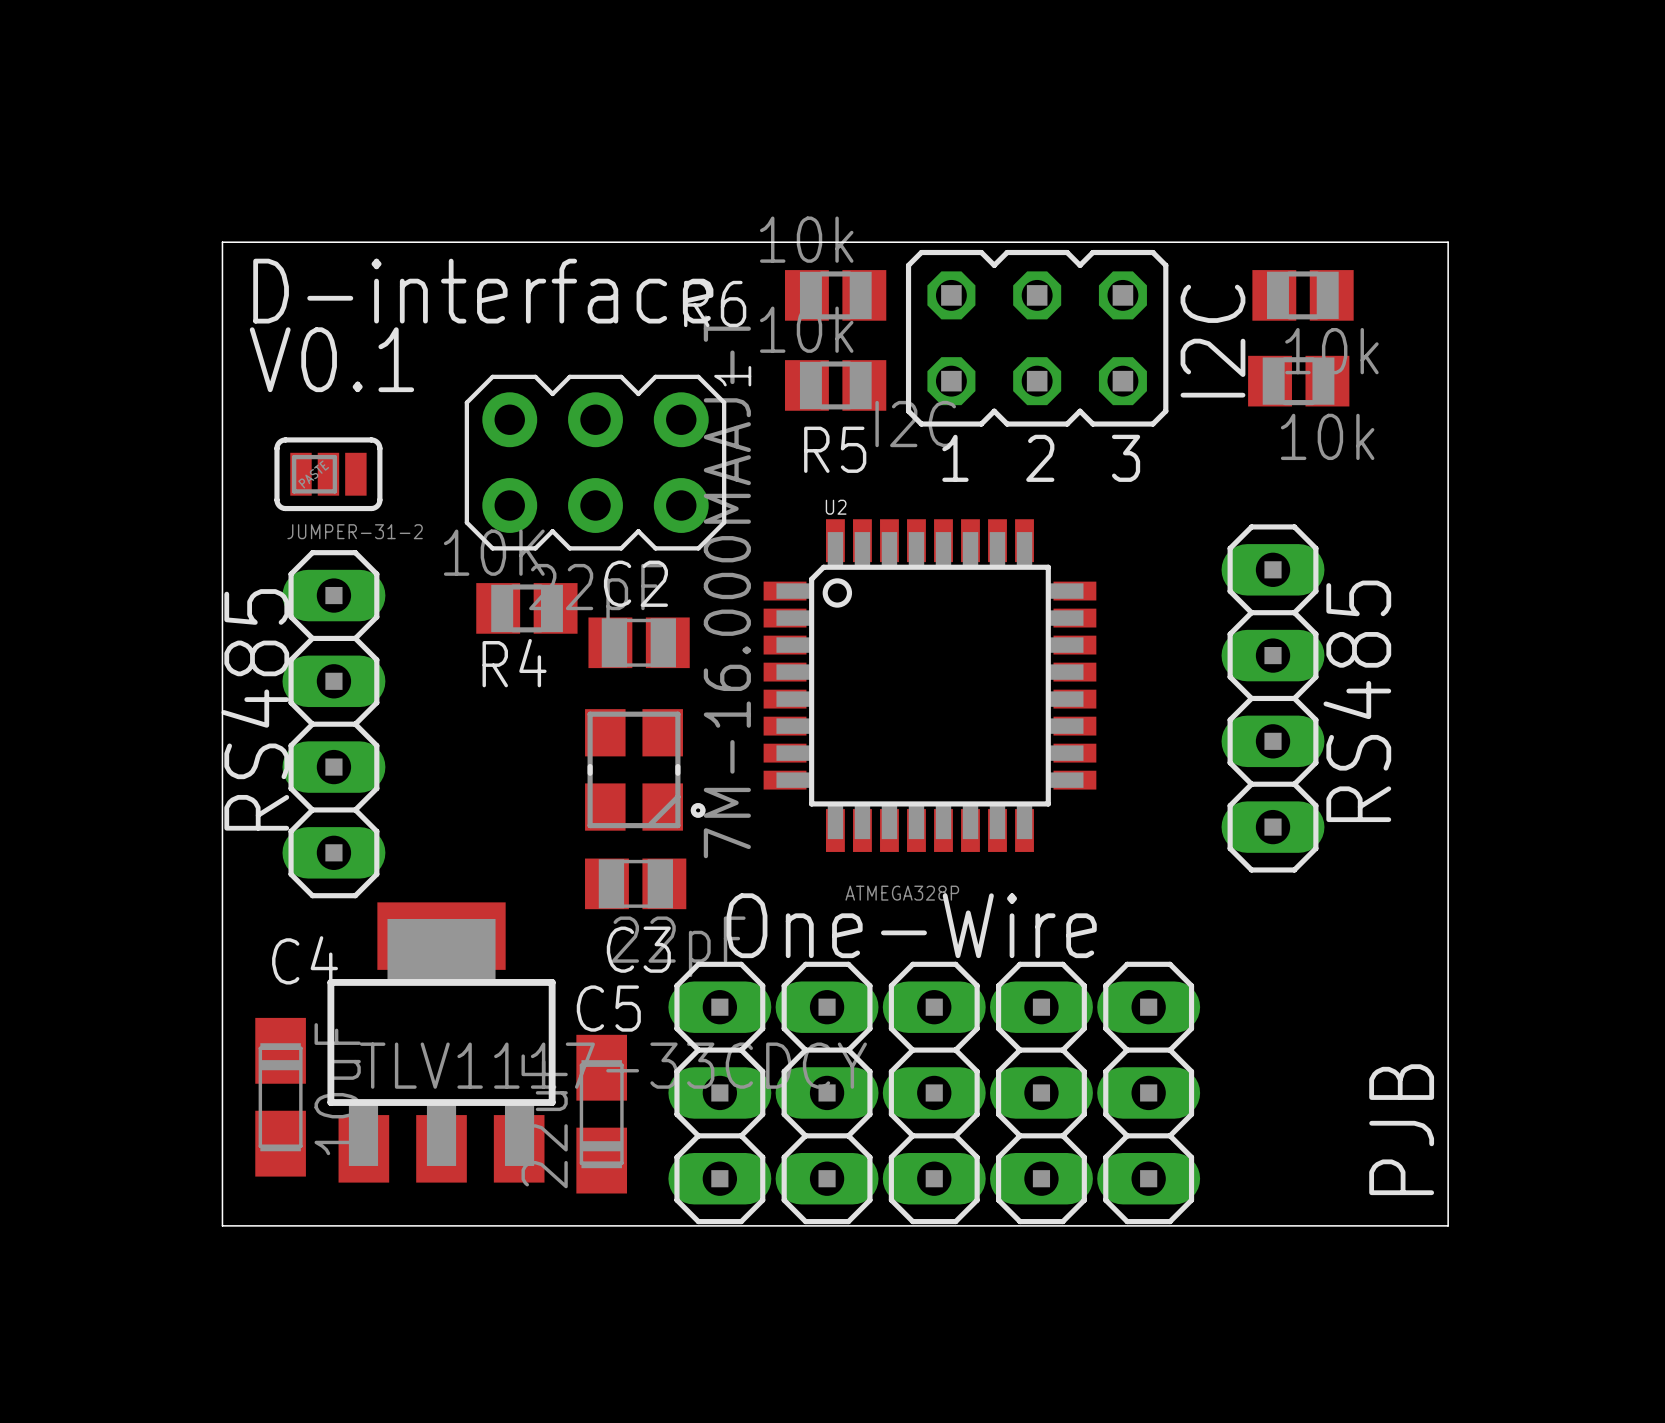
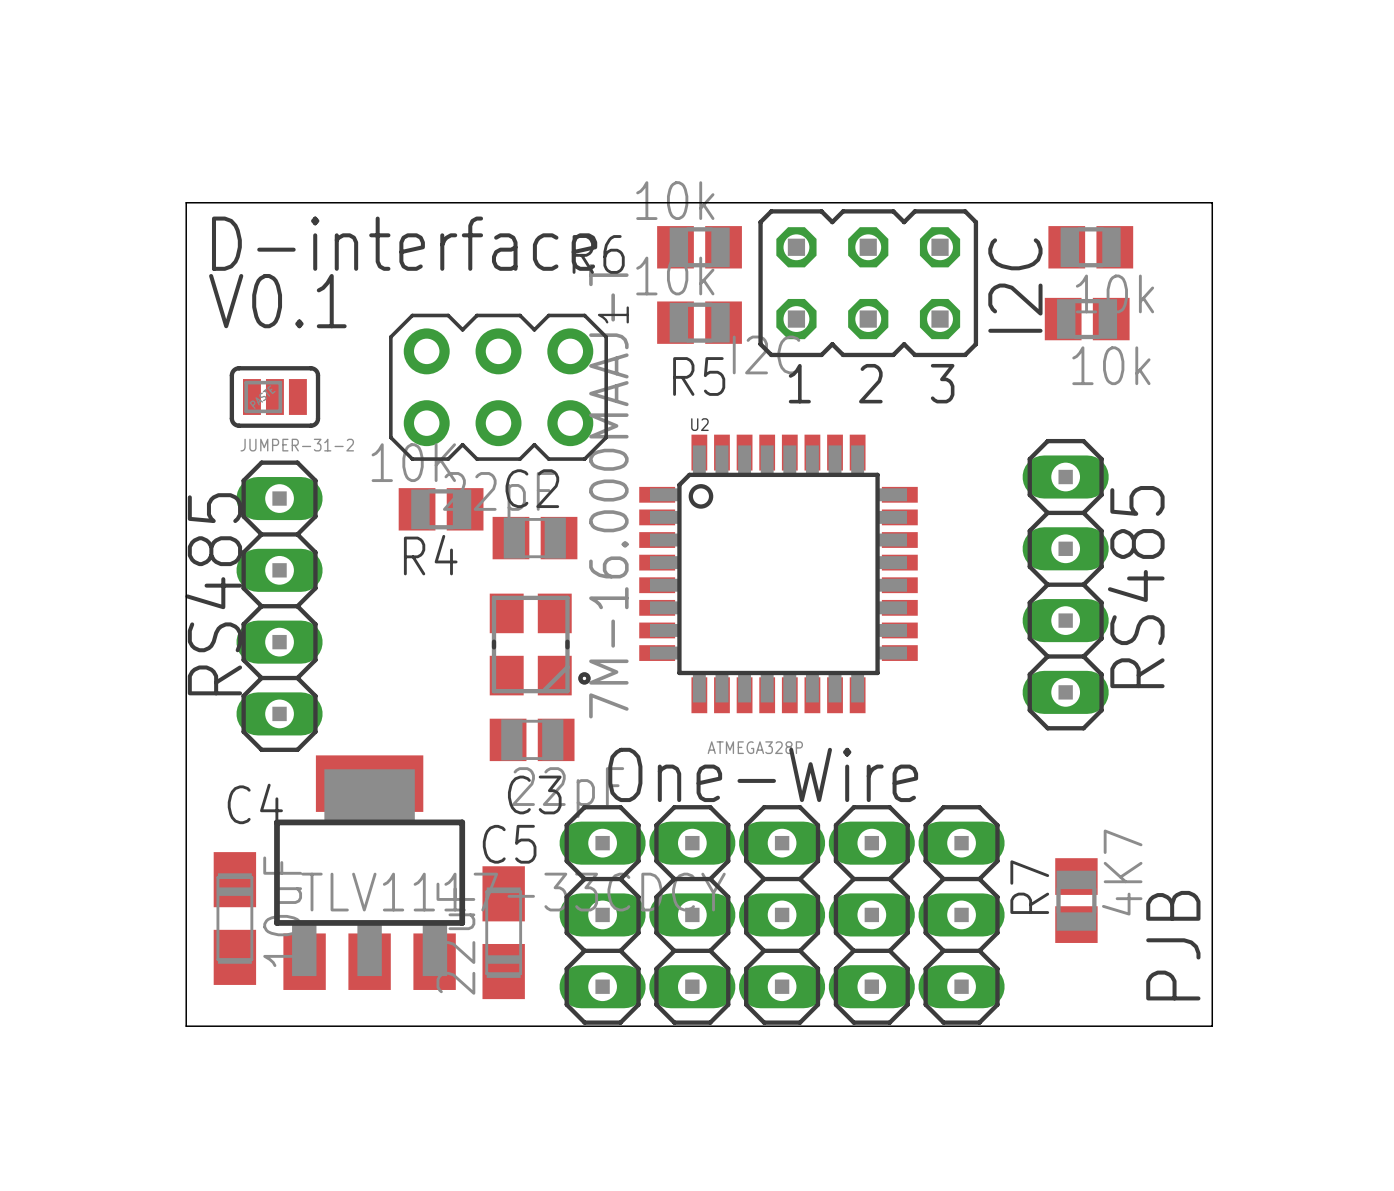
R7: none -> 4K7 (1076, 900)

